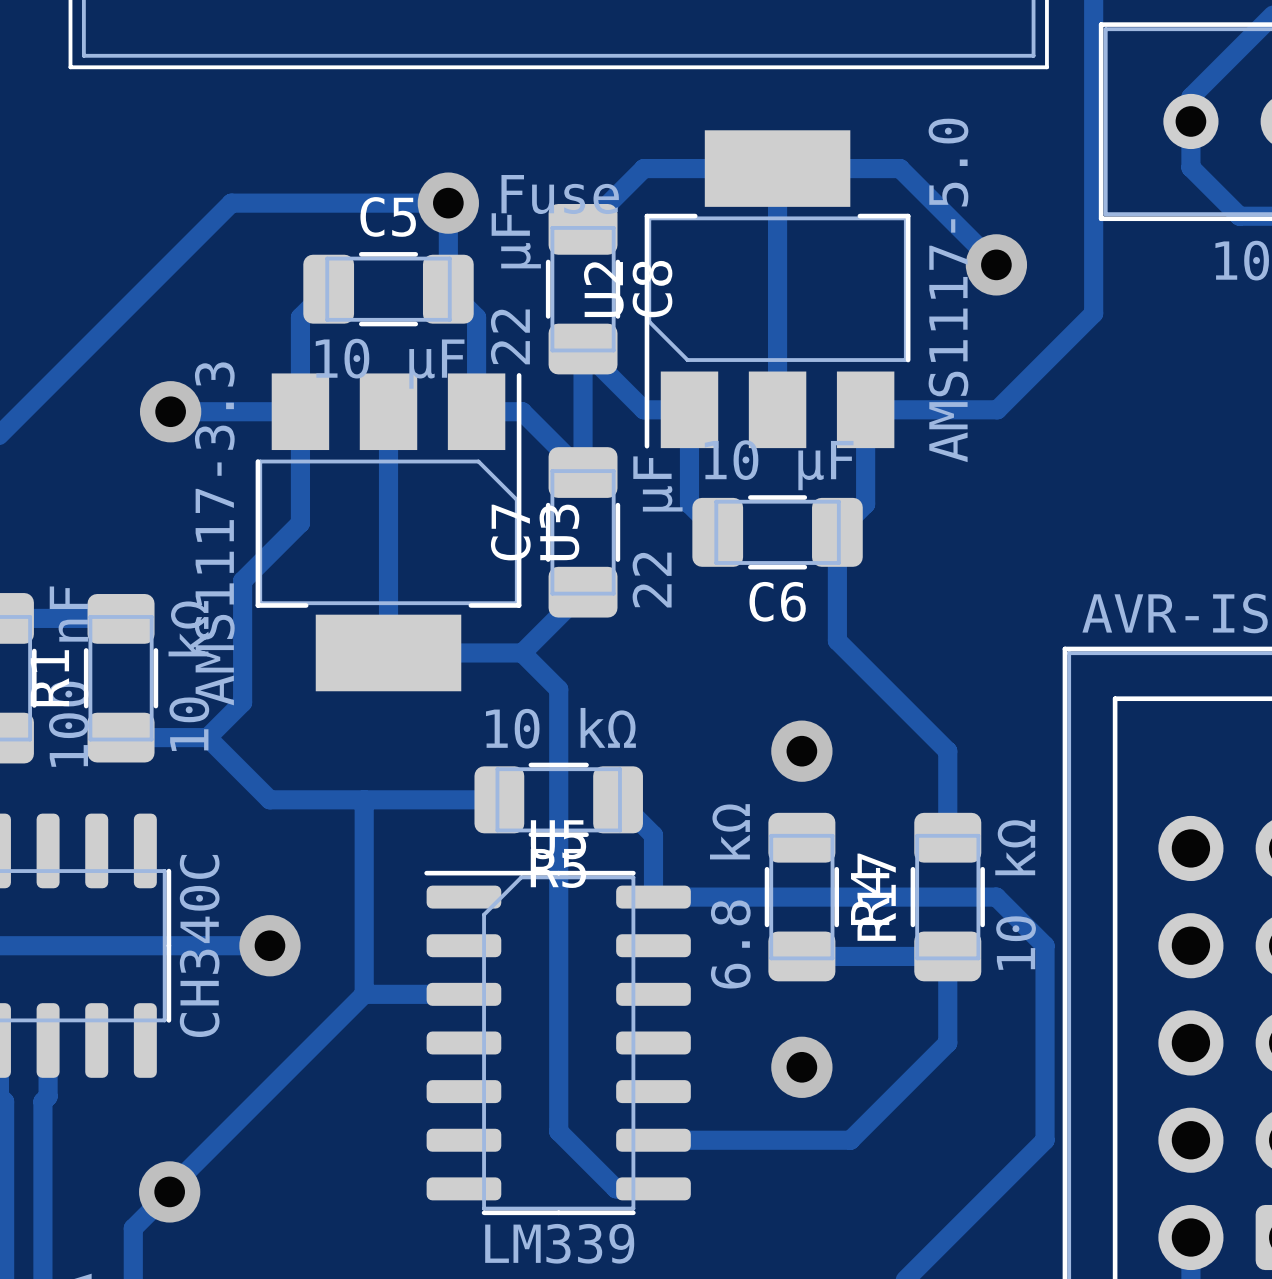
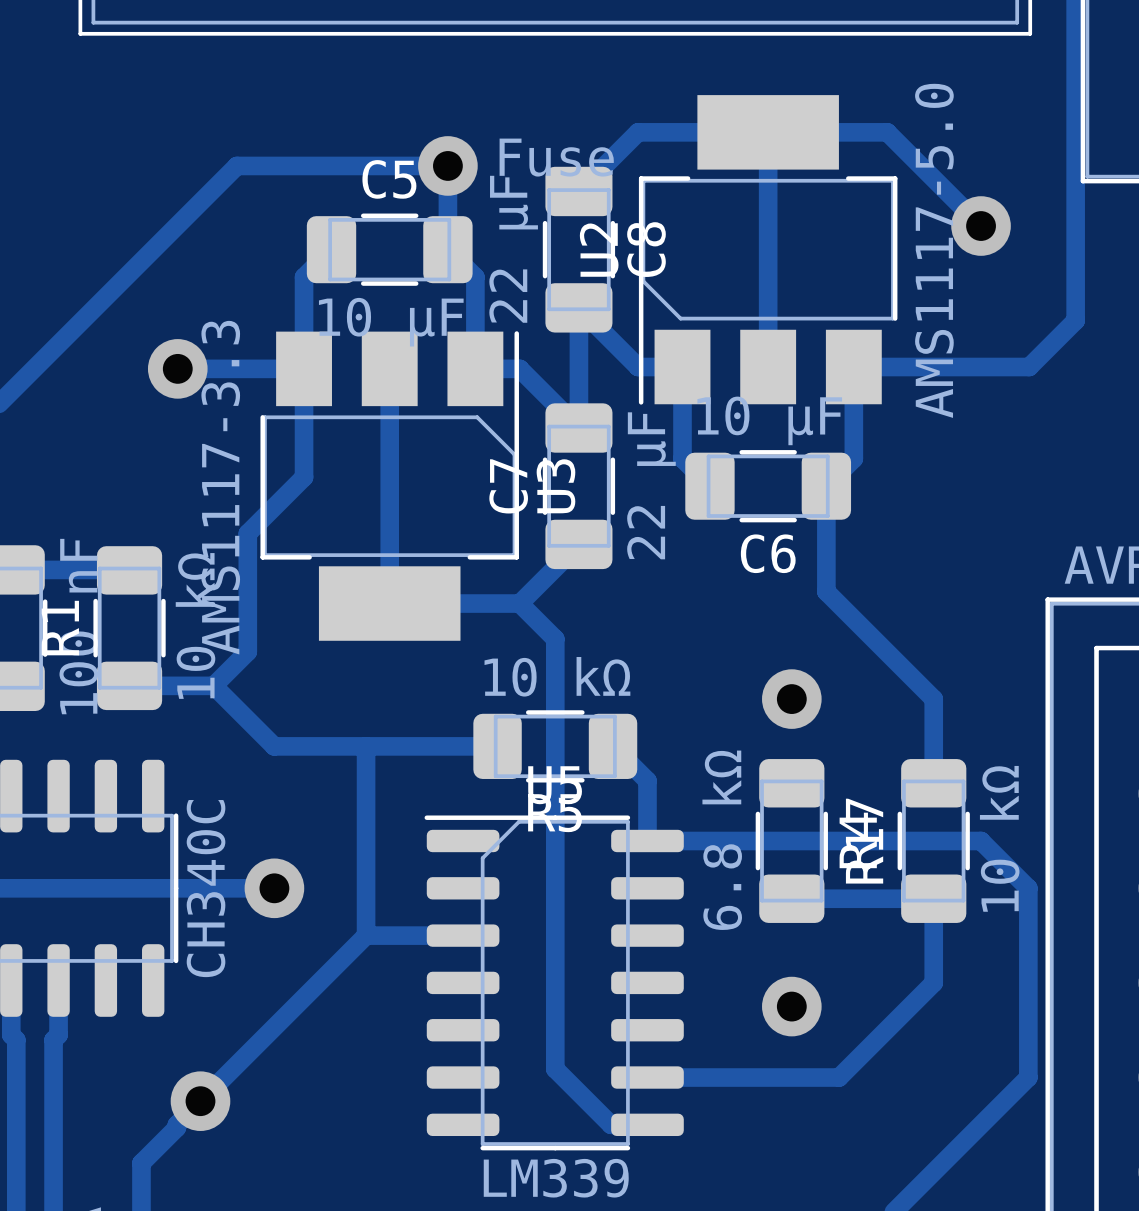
track: (1093, 313) (997, 409) -> (1075, 273) (1075, 320) (1029, 367) (981, 367)
via position: (169, 1191) -> (200, 1101)

